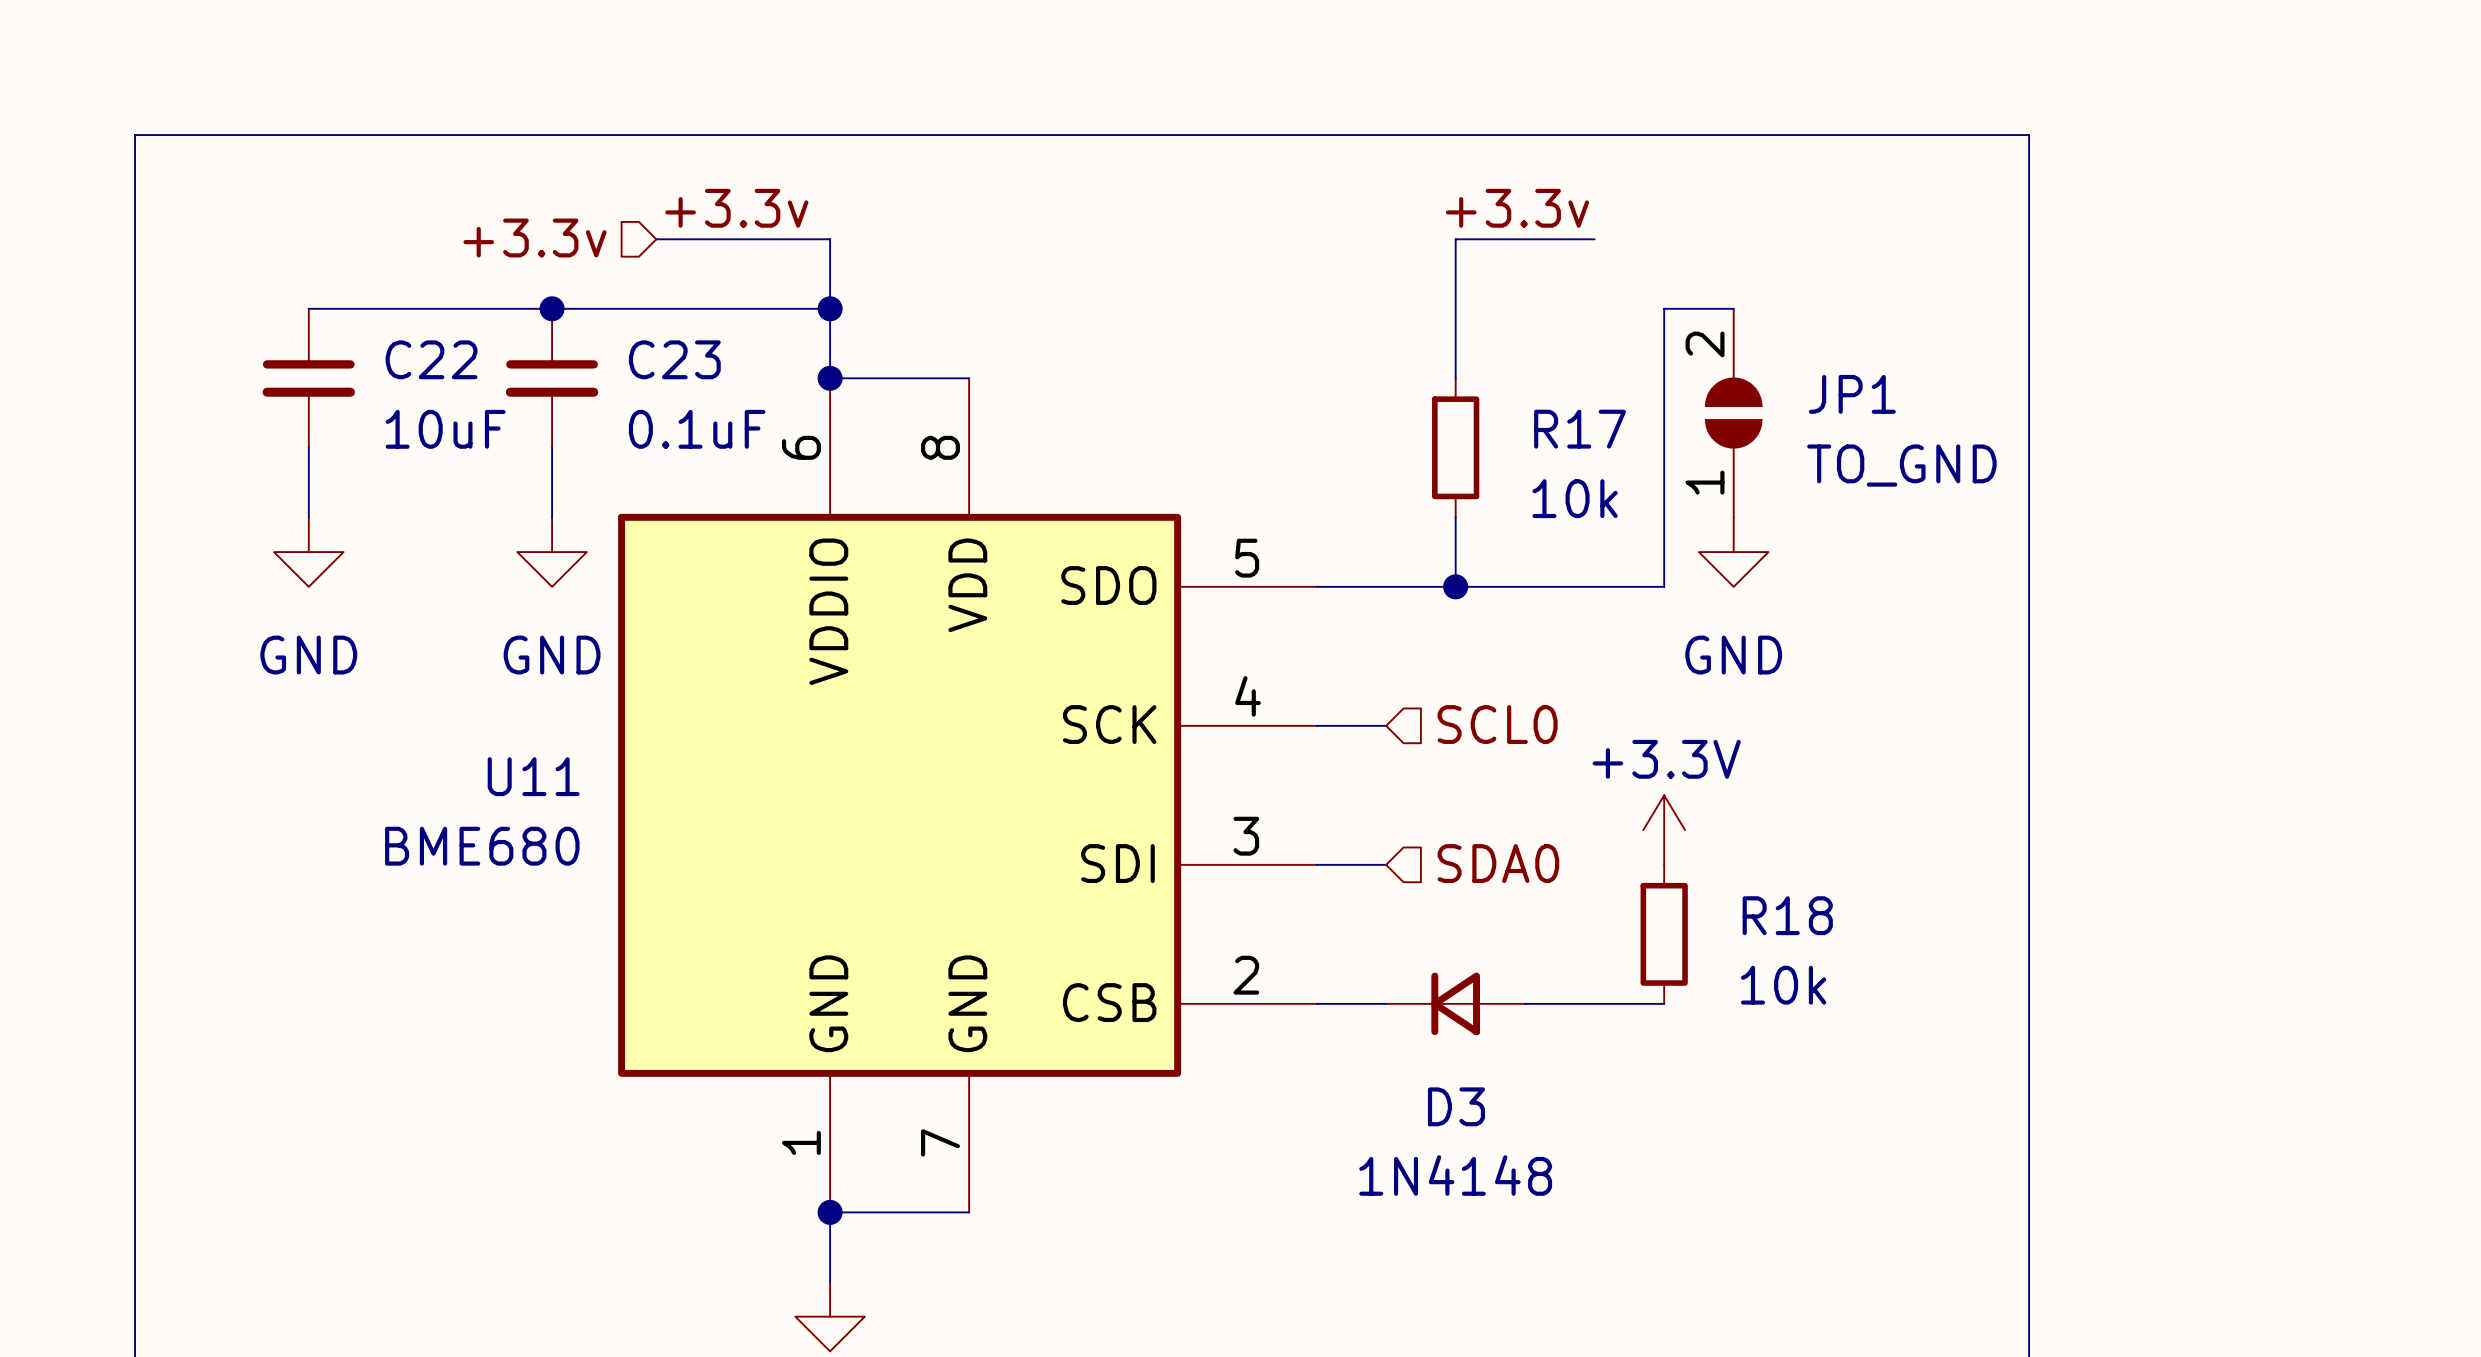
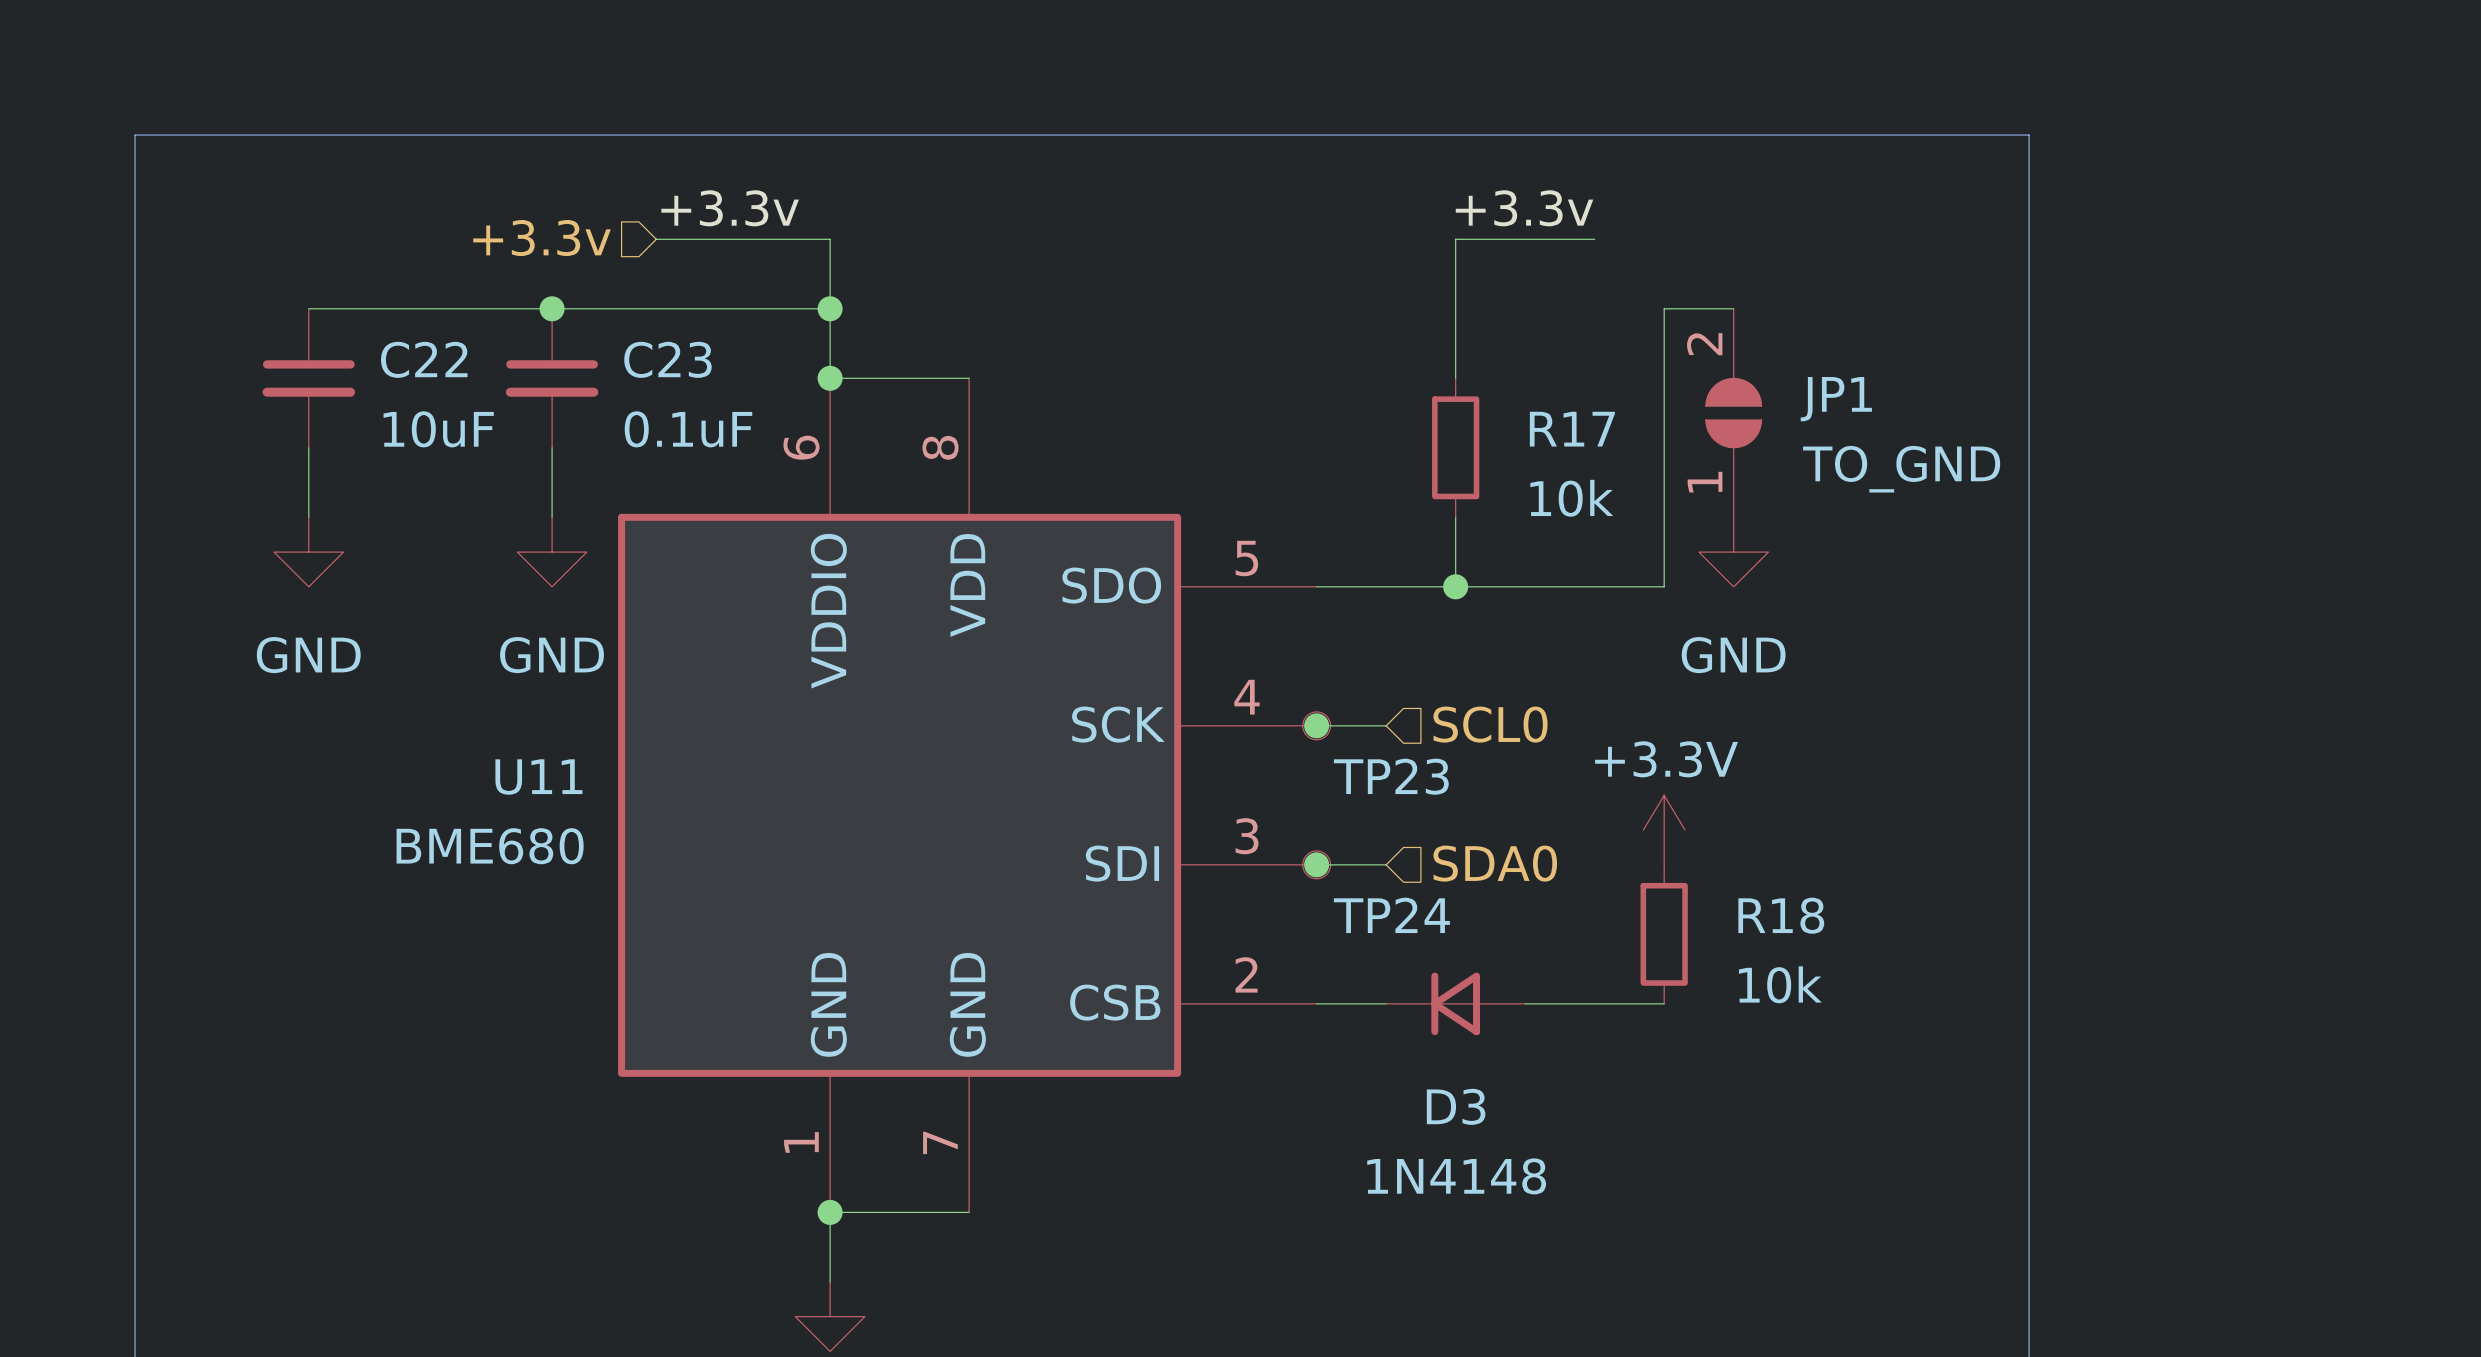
junction: none -> (1316, 725)
TP23: none -> (1316, 725)
junction: none -> (1316, 864)
TP24: none -> (1316, 864)

